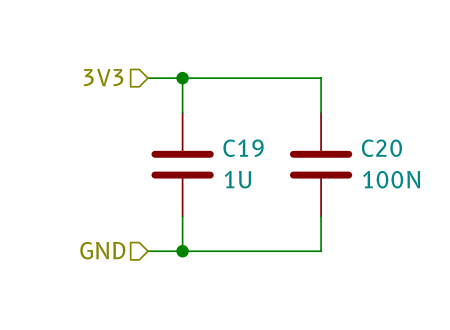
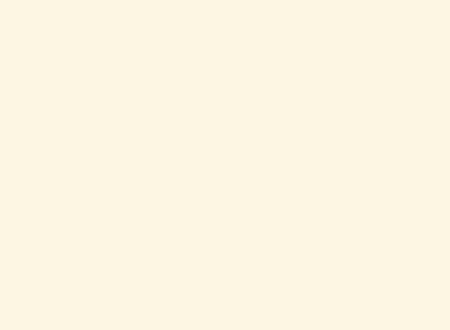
hierarchical label: 3V3 (103, 77) -> none
wire: (147, 78) (321, 78) (321, 112) -> none
wire: (182, 78) (182, 112) -> none
junction: (182, 78) -> none
C19: 1U (182, 164) -> none
C20: 100N (321, 164) -> none
wire: (182, 216) (182, 251) -> none
wire: (321, 216) (321, 251) (147, 251) -> none
hierarchical label: GND (102, 250) -> none
junction: (182, 251) -> none

